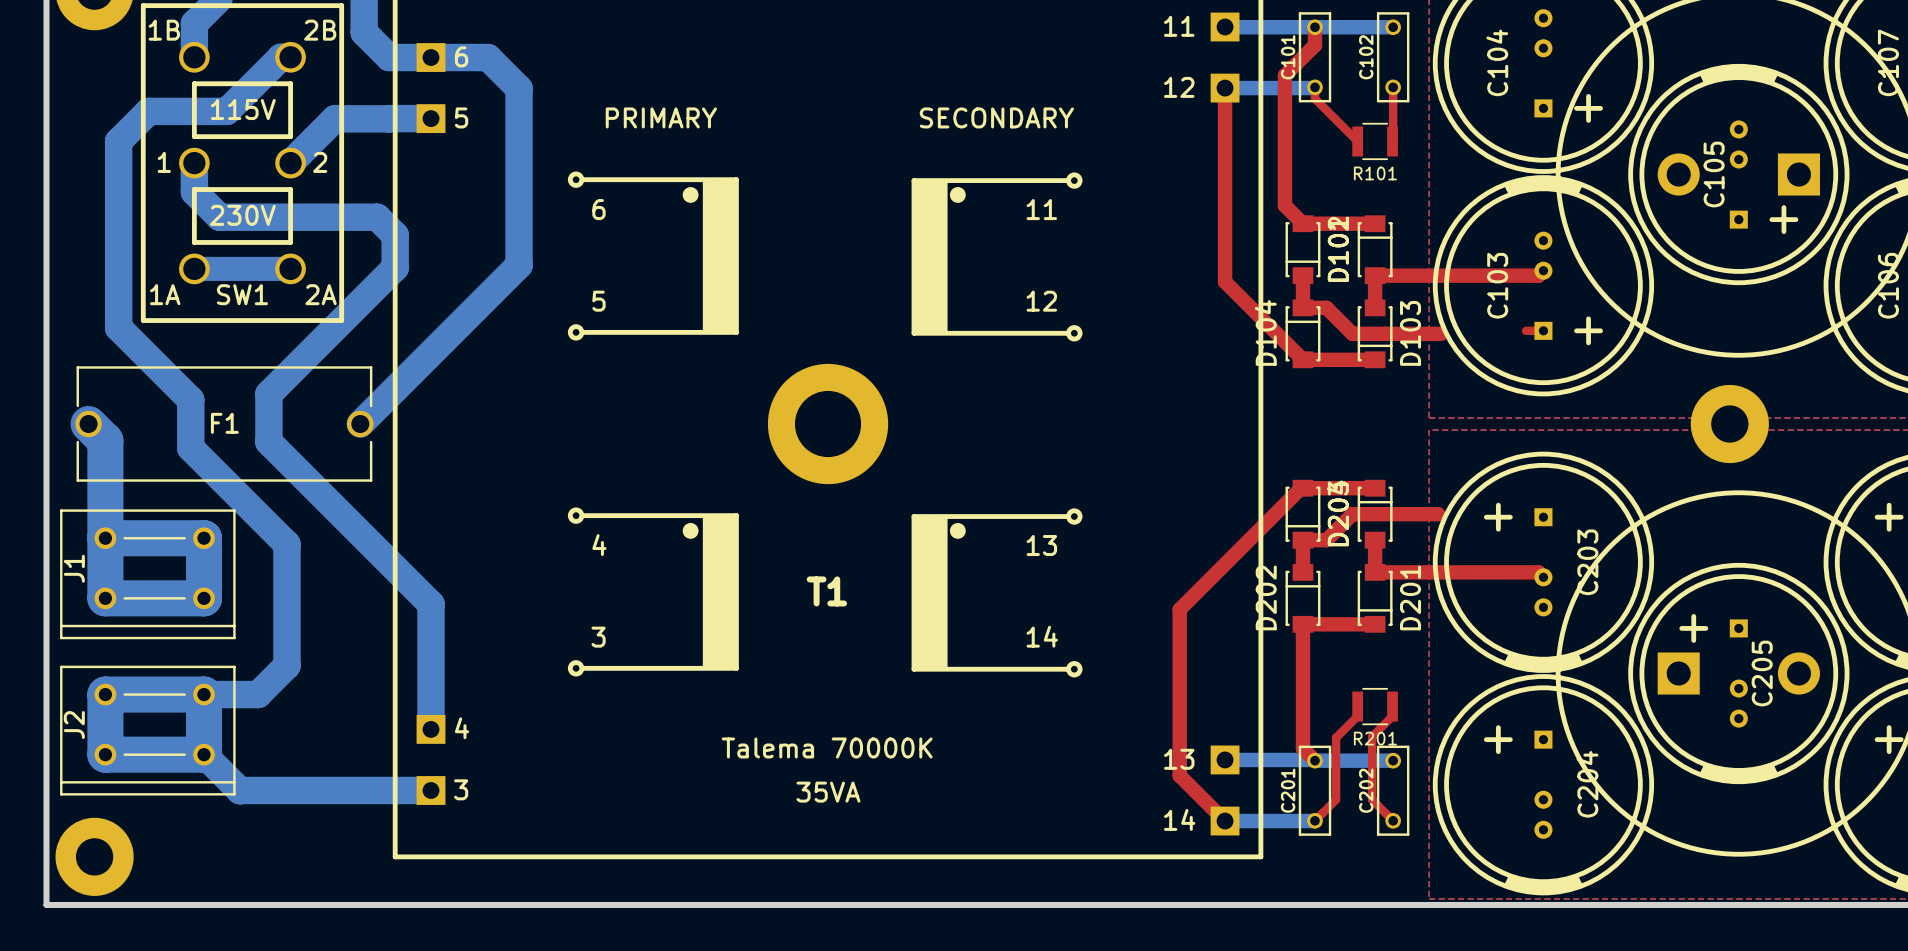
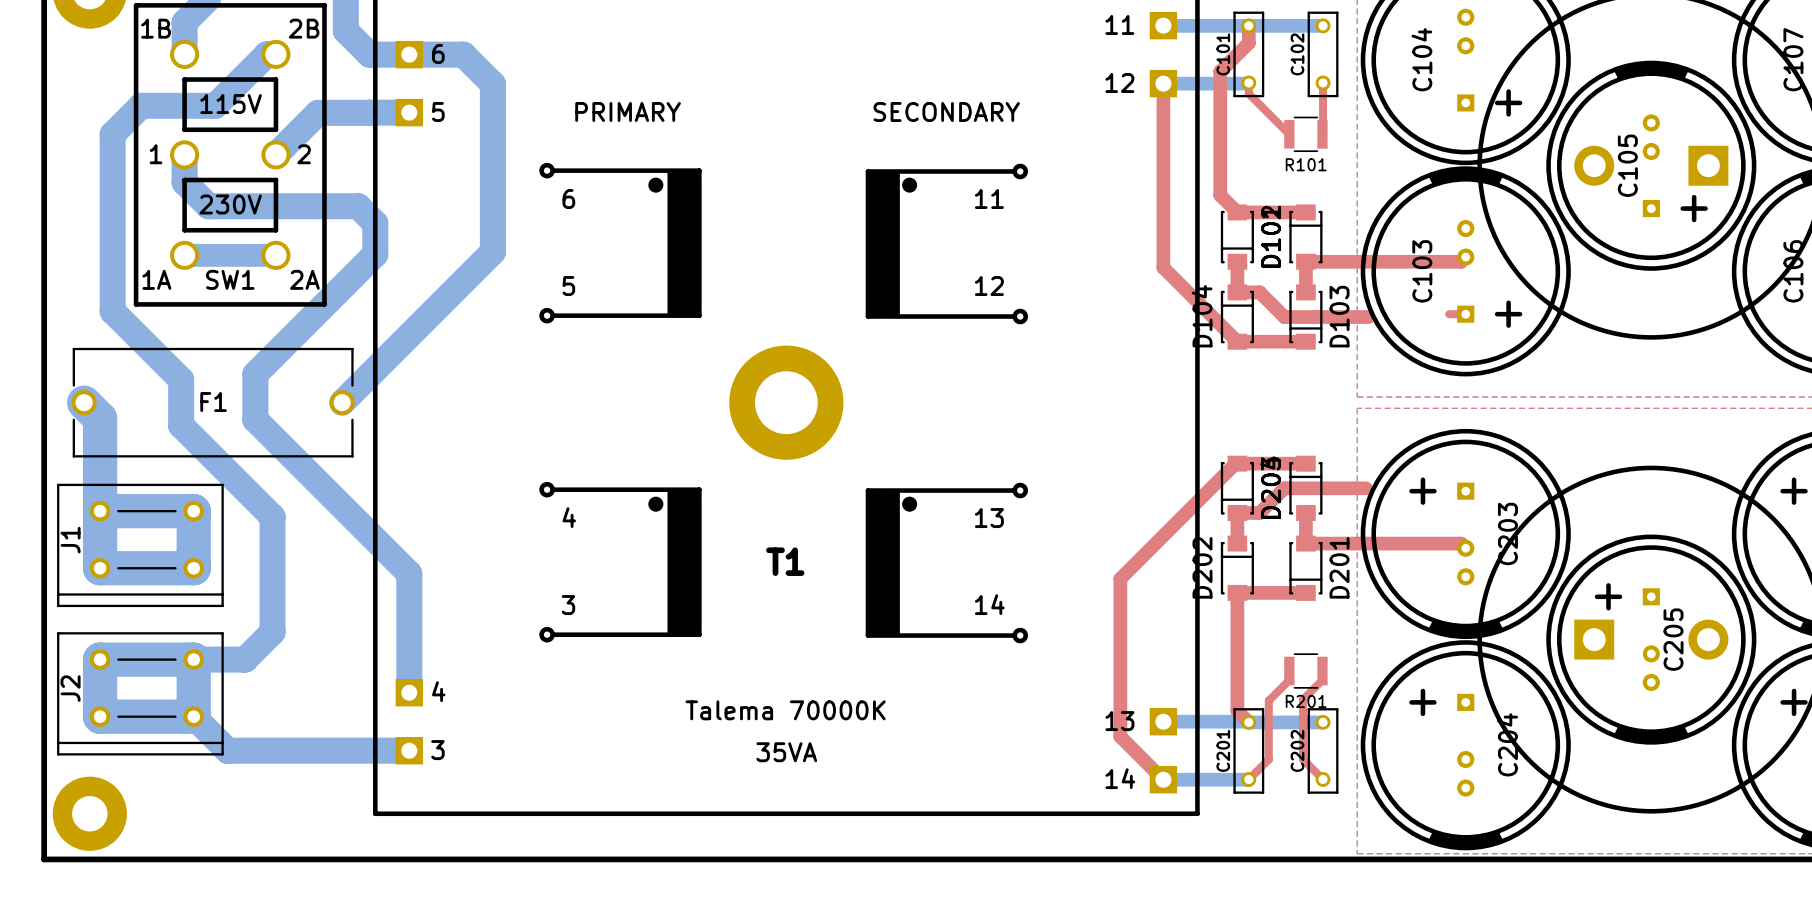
part: (1729, 424) -> none

